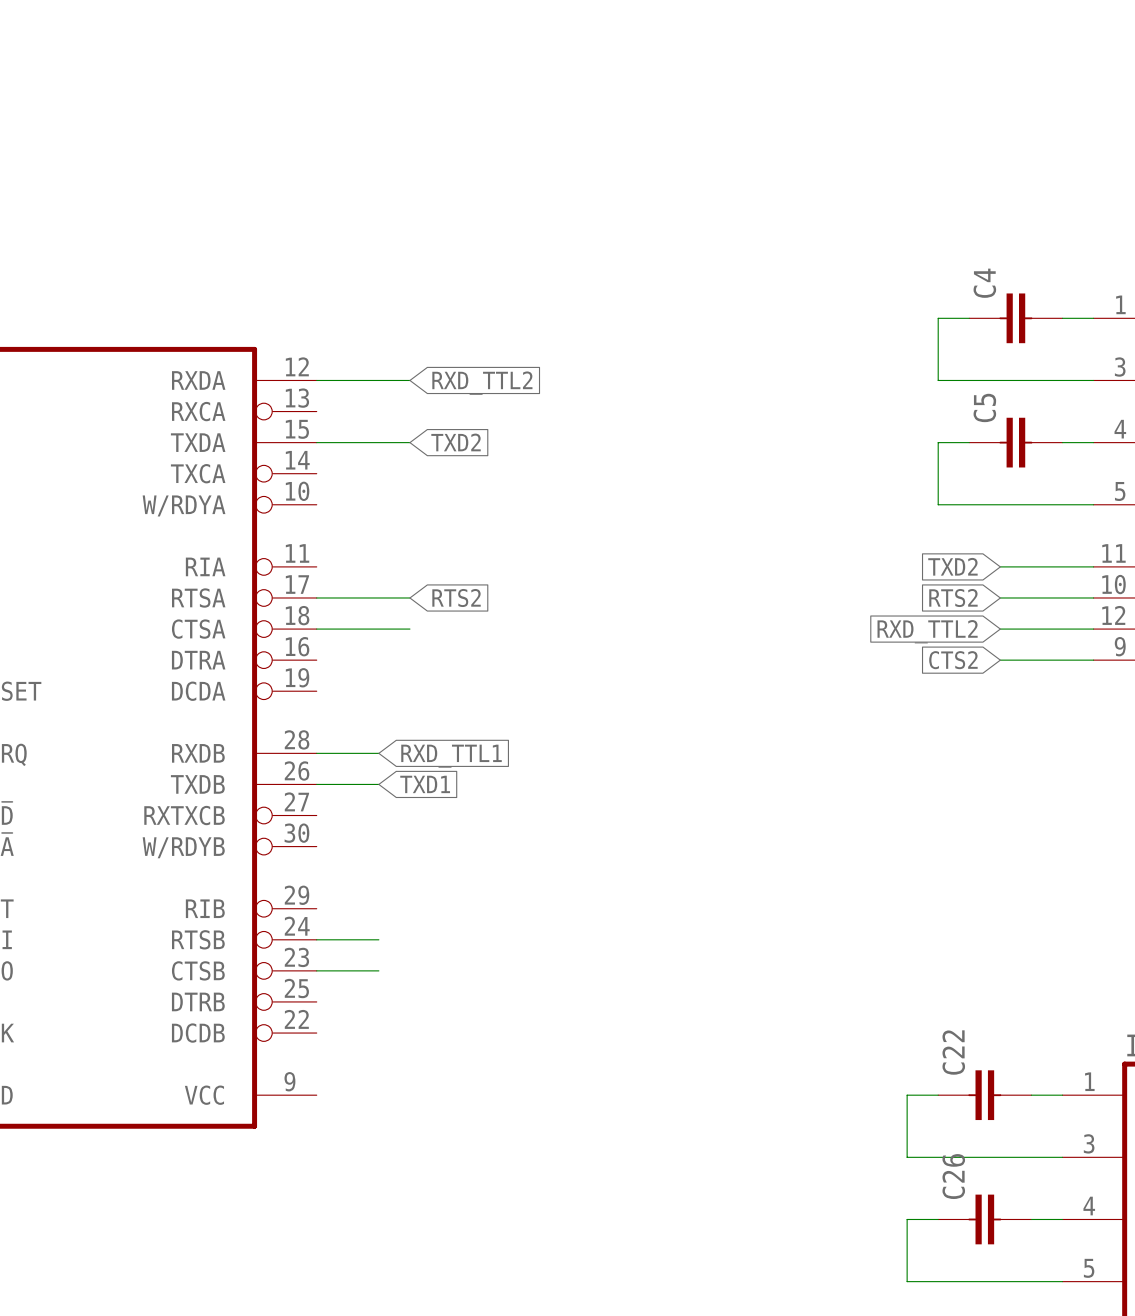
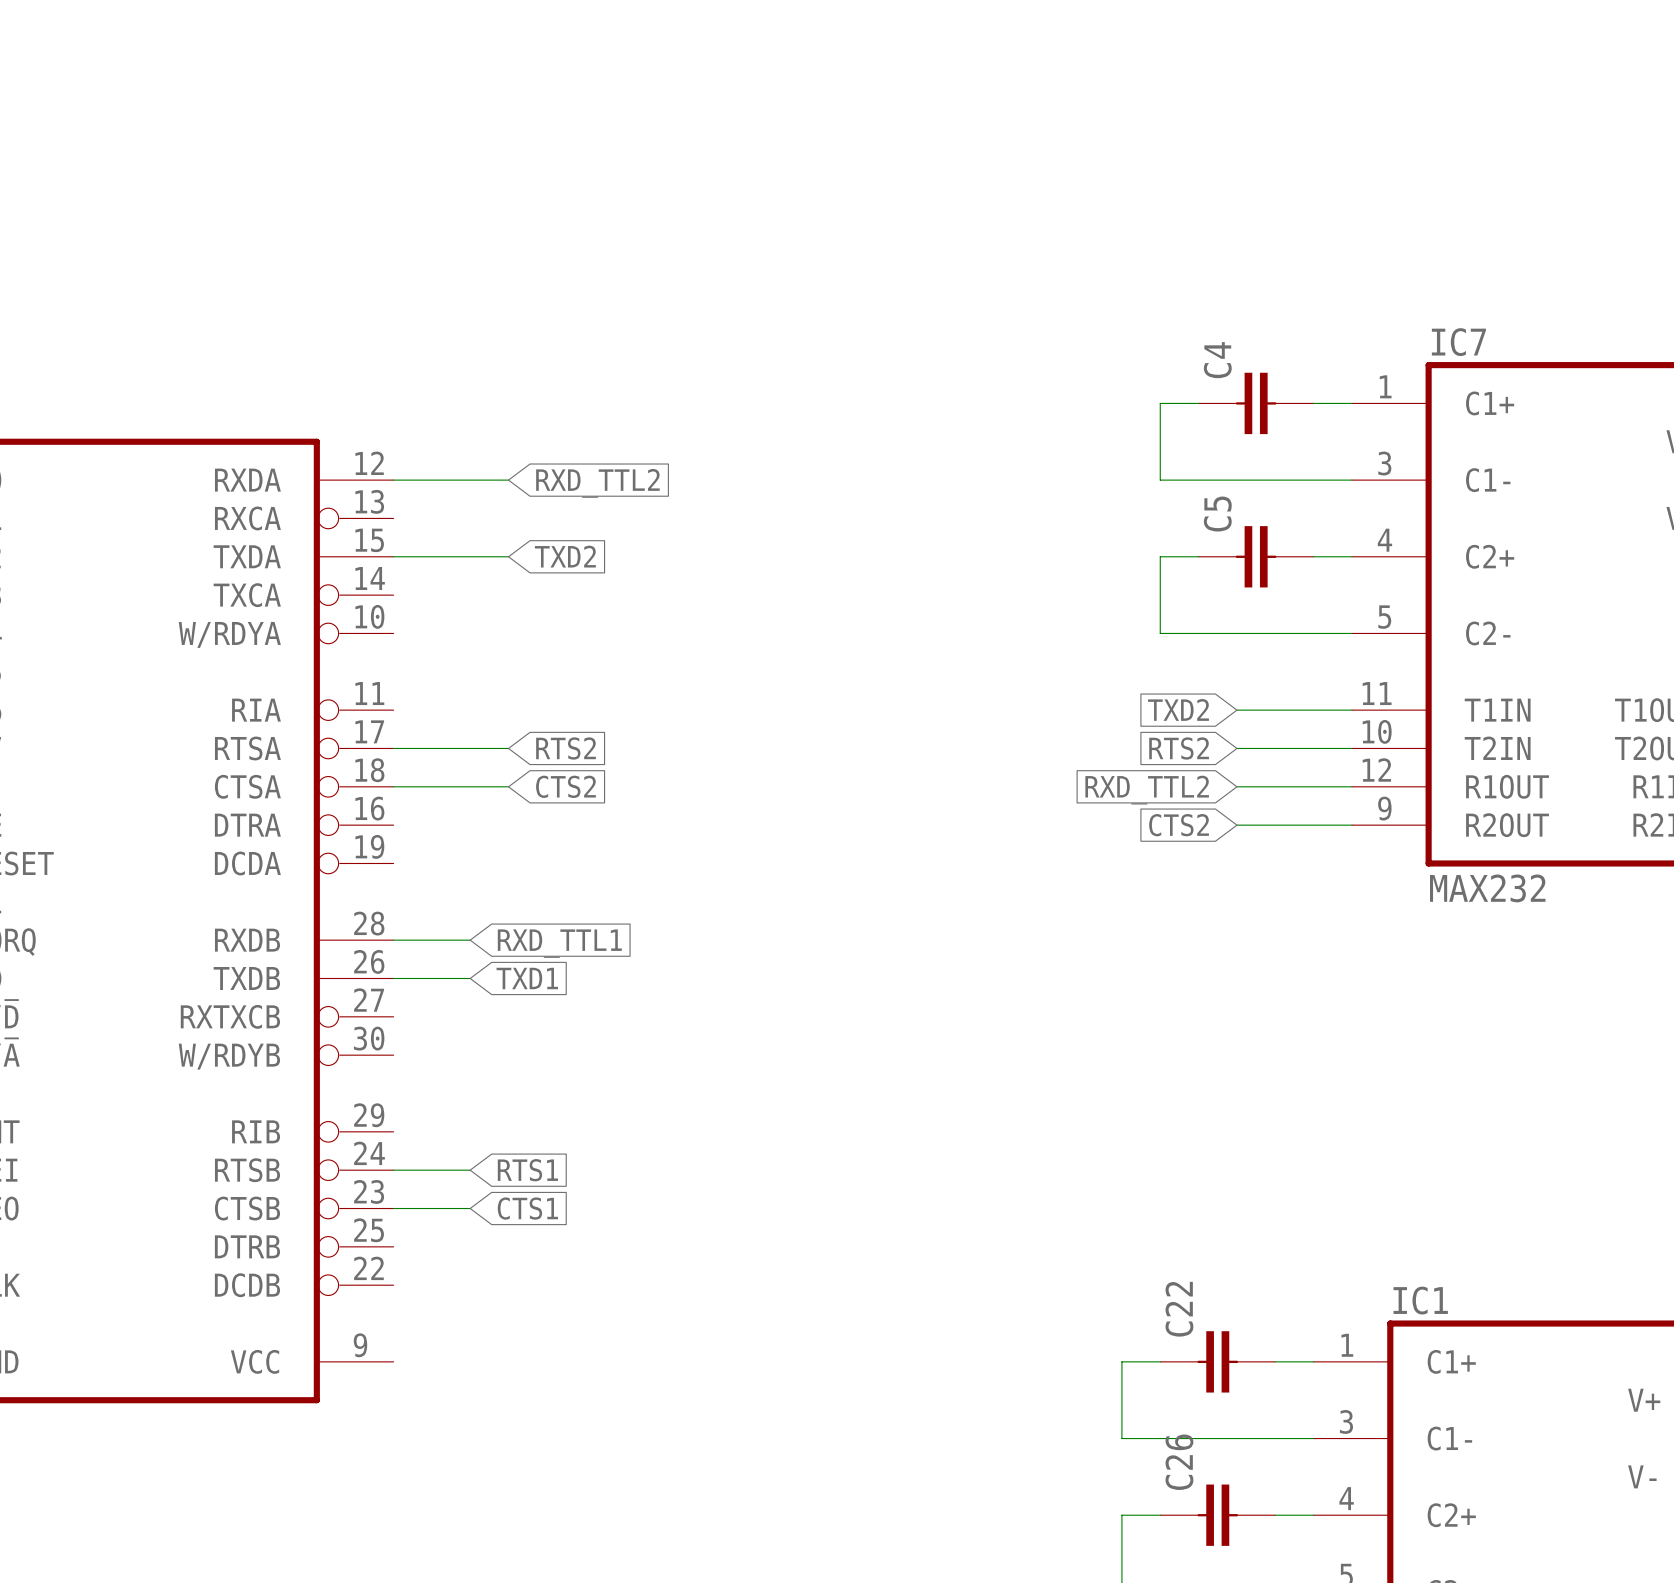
global label: none -> CTS2 (565, 786)
global label: none -> RTS1 (527, 1170)
global label: none -> CTS1 (527, 1208)

